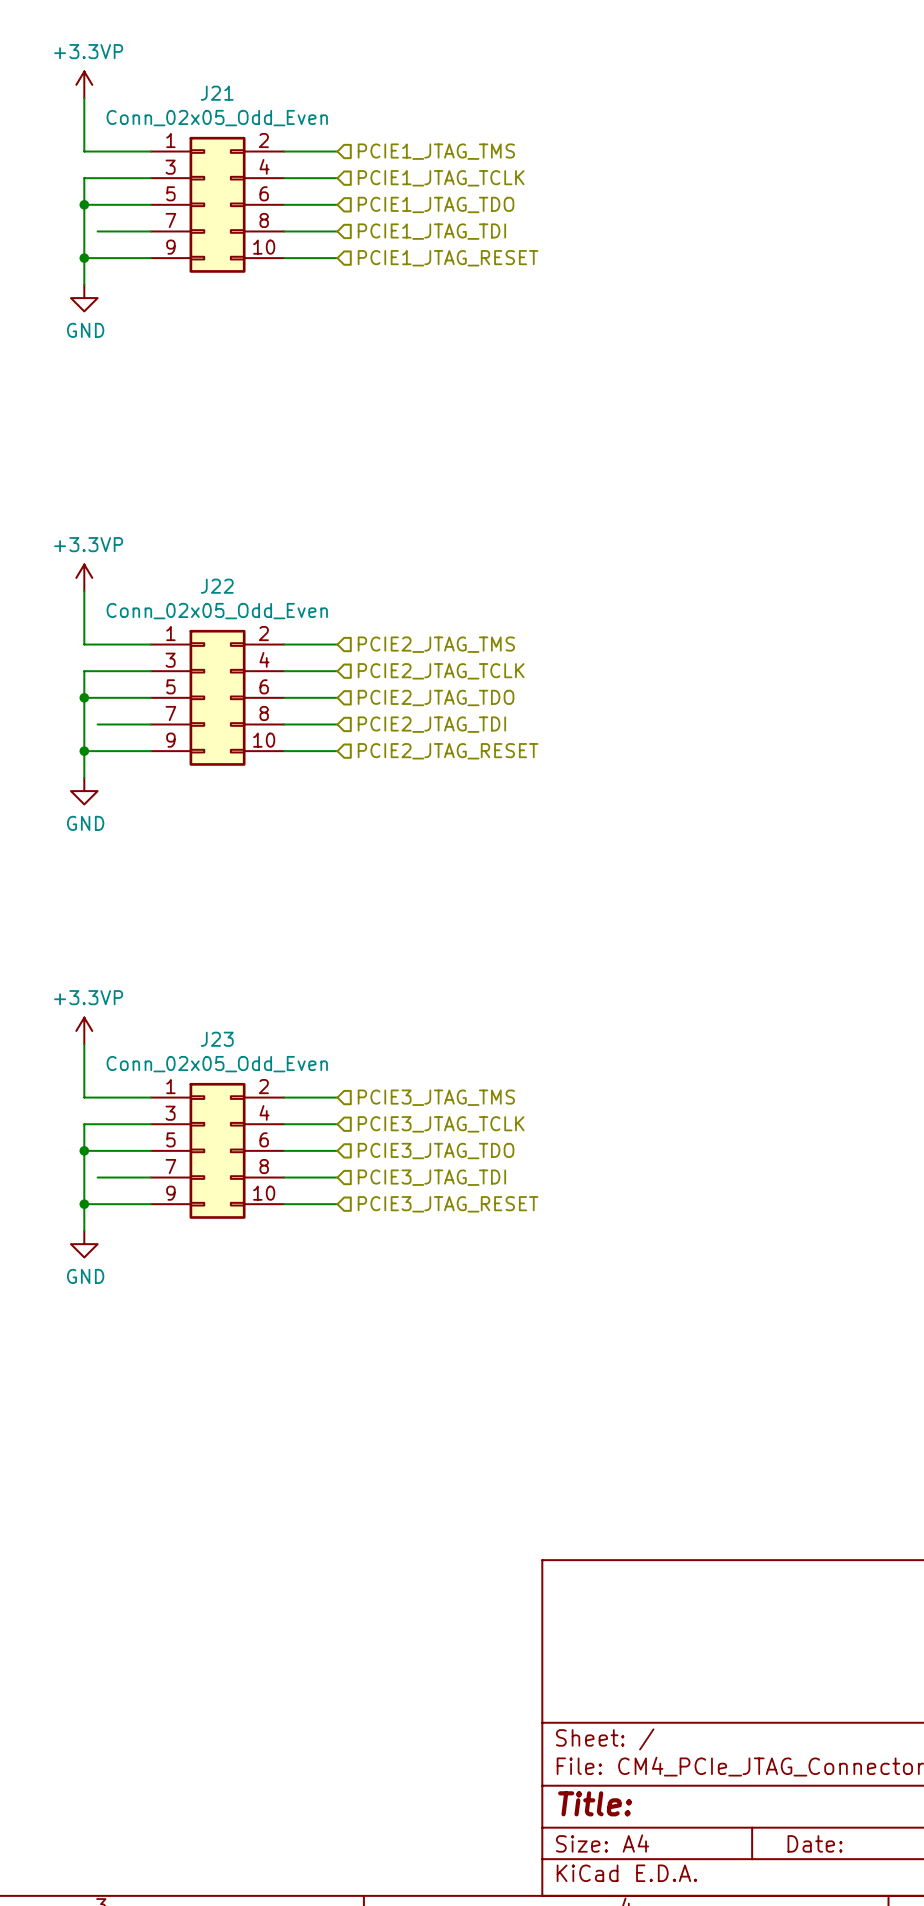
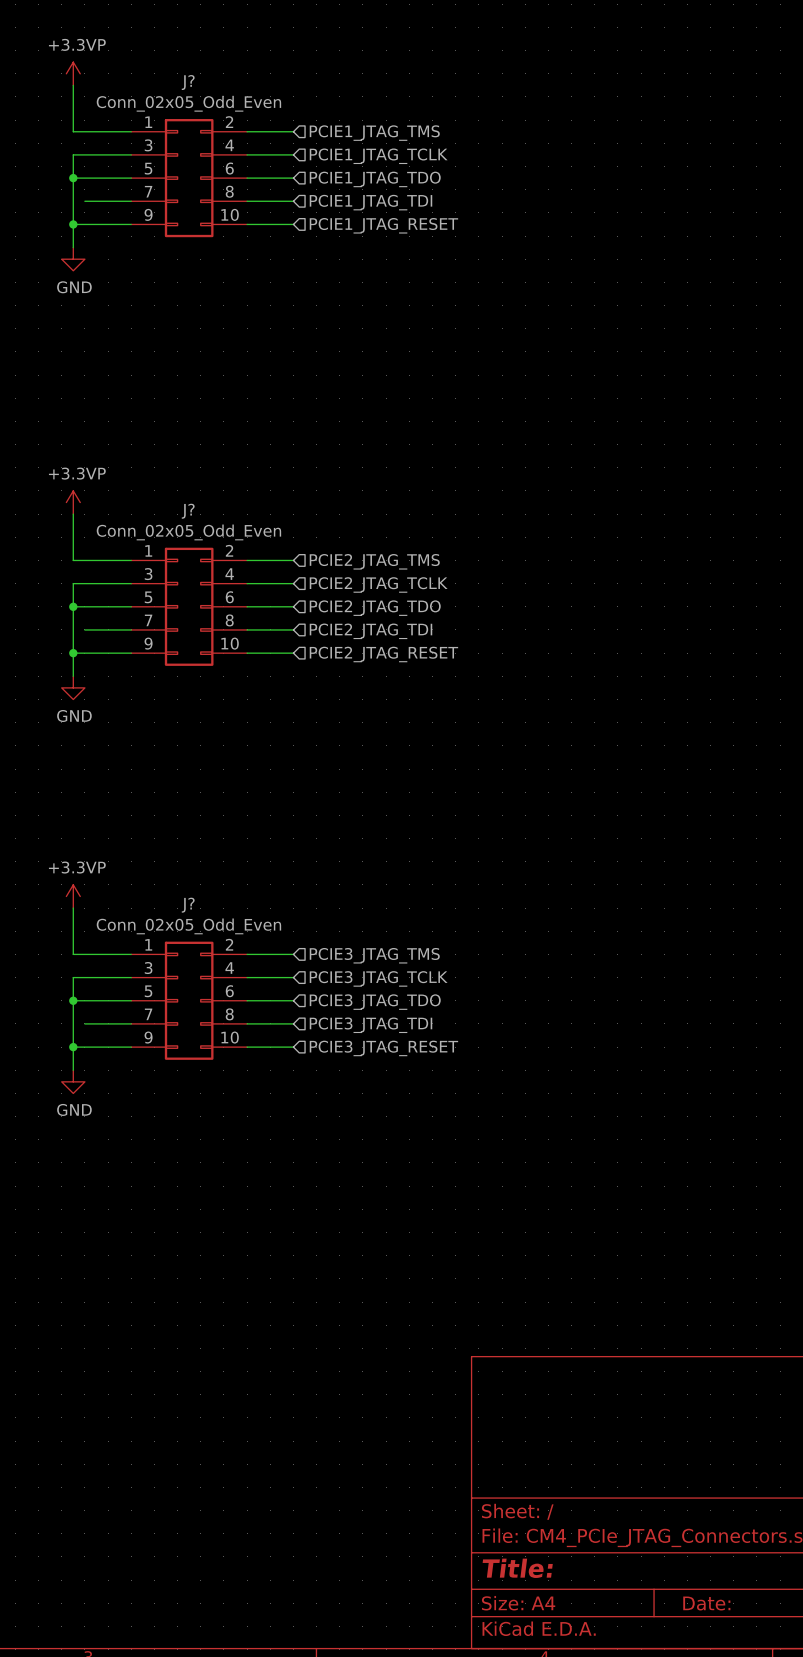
J21 name: J21 (217, 93) -> J? (188, 82)
J22 name: J22 (217, 586) -> J? (188, 511)
J23 name: J23 (217, 1039) -> J? (188, 905)

